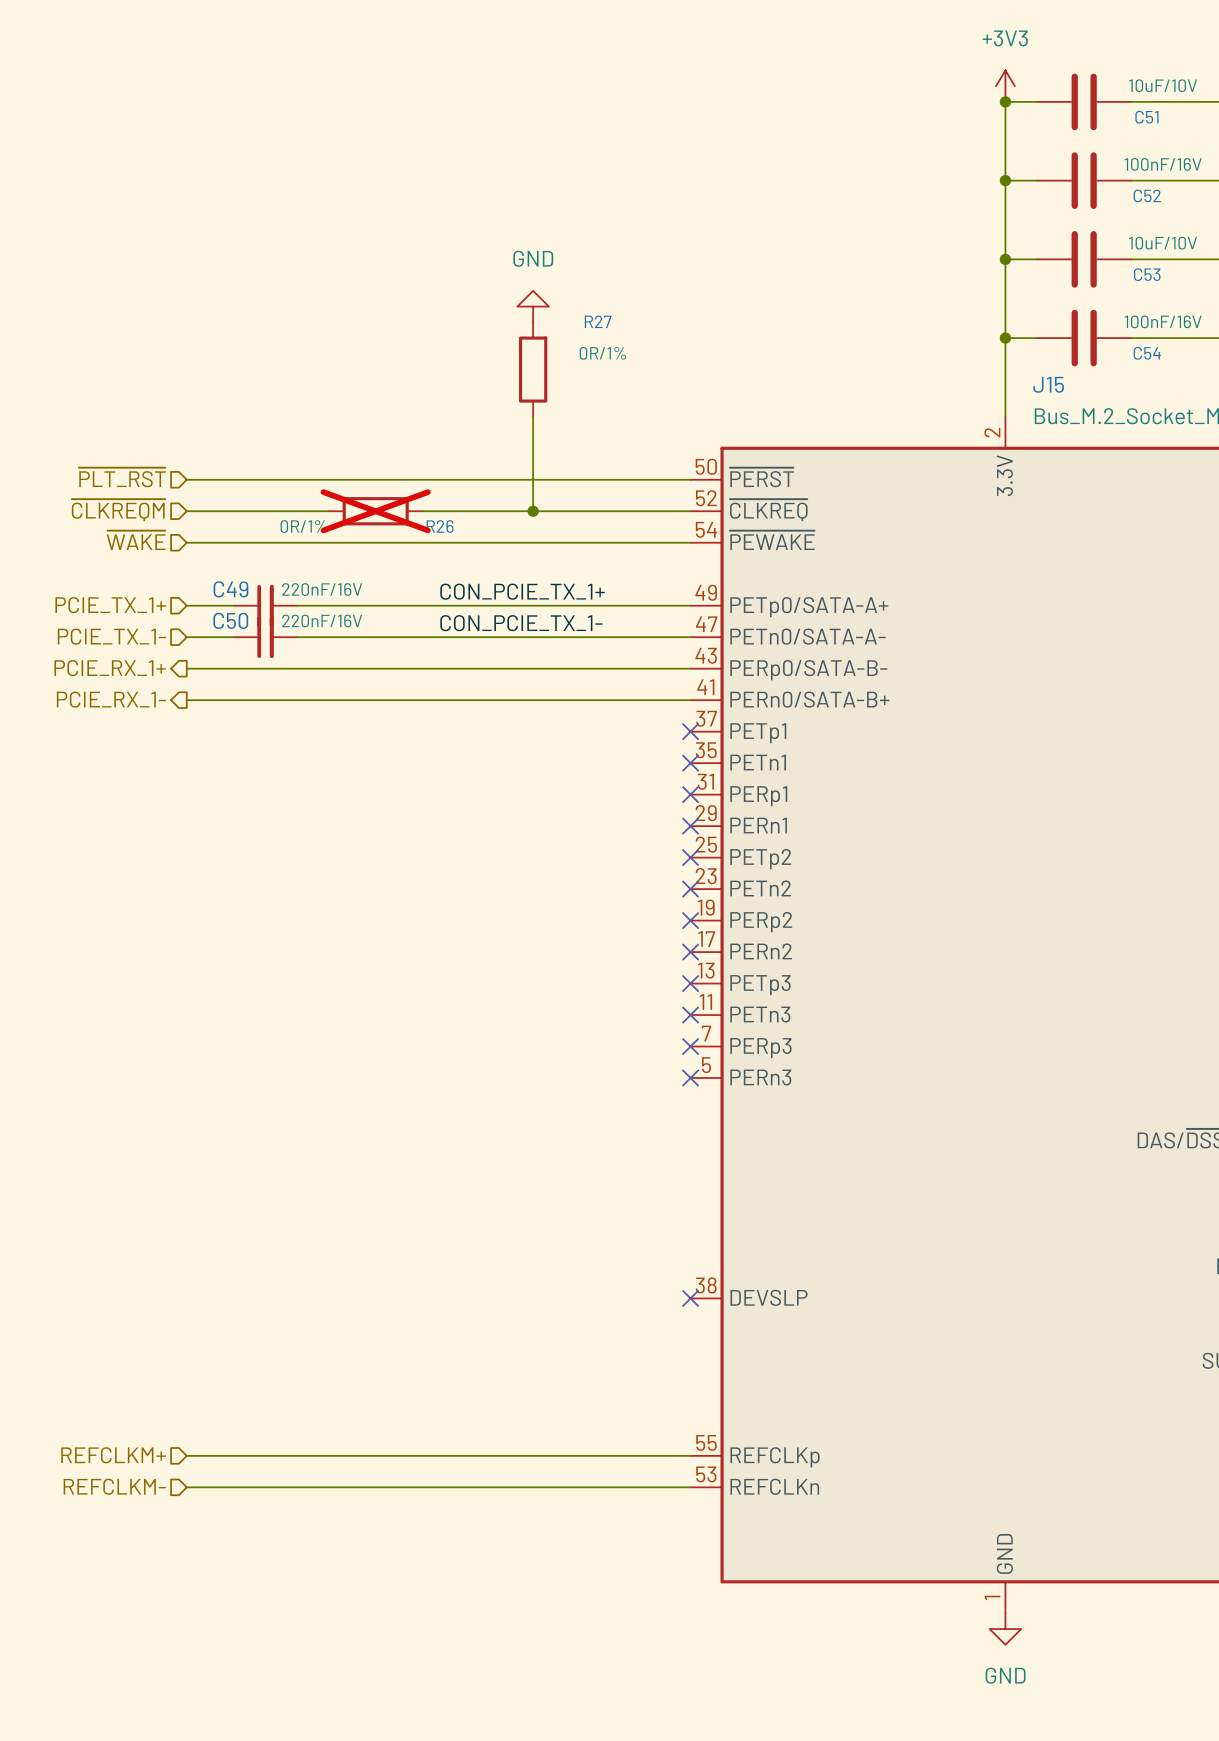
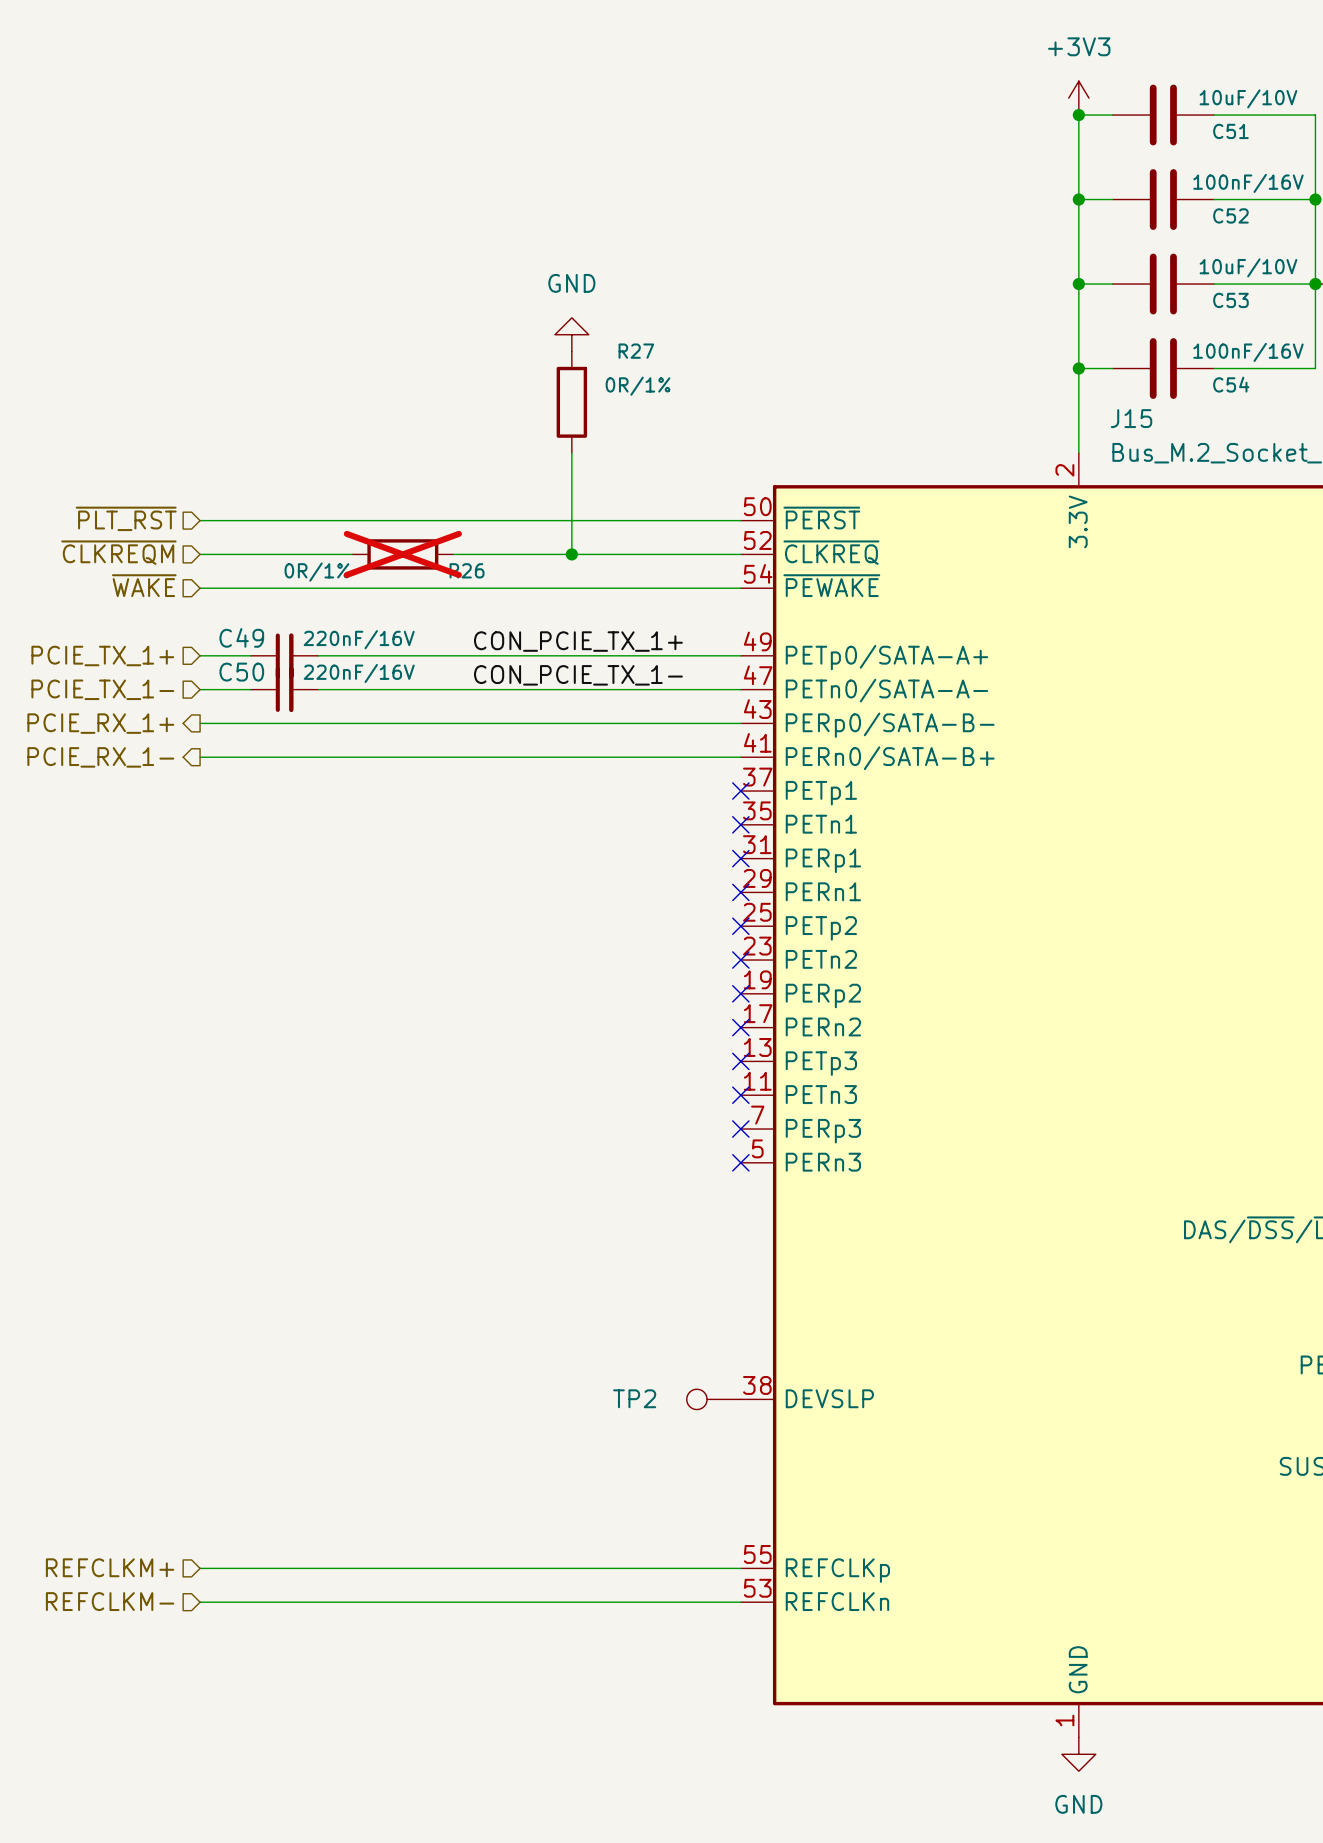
TP2: none -> (713, 1399)
no-connect mark: (690, 1298) -> none

